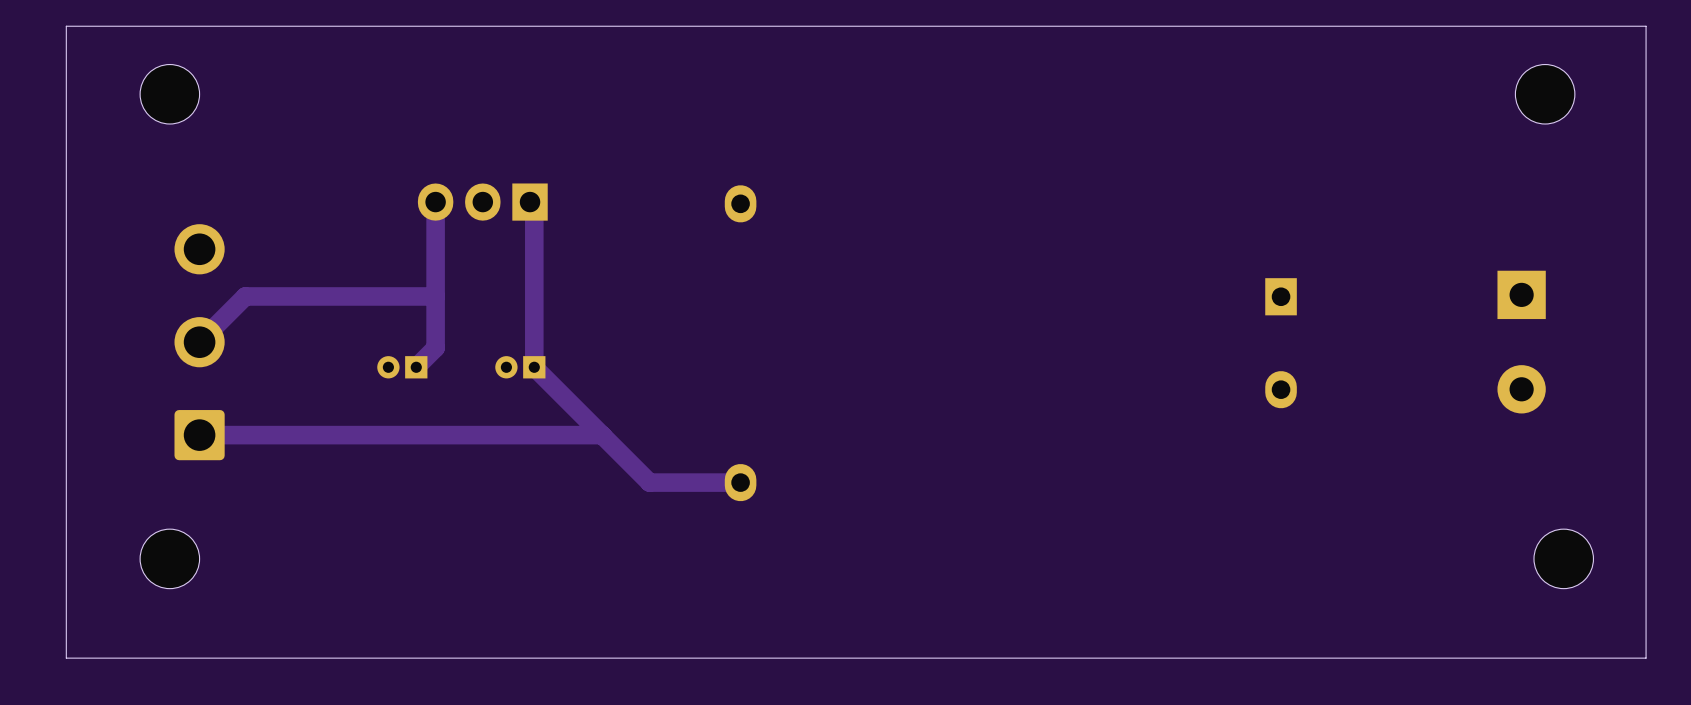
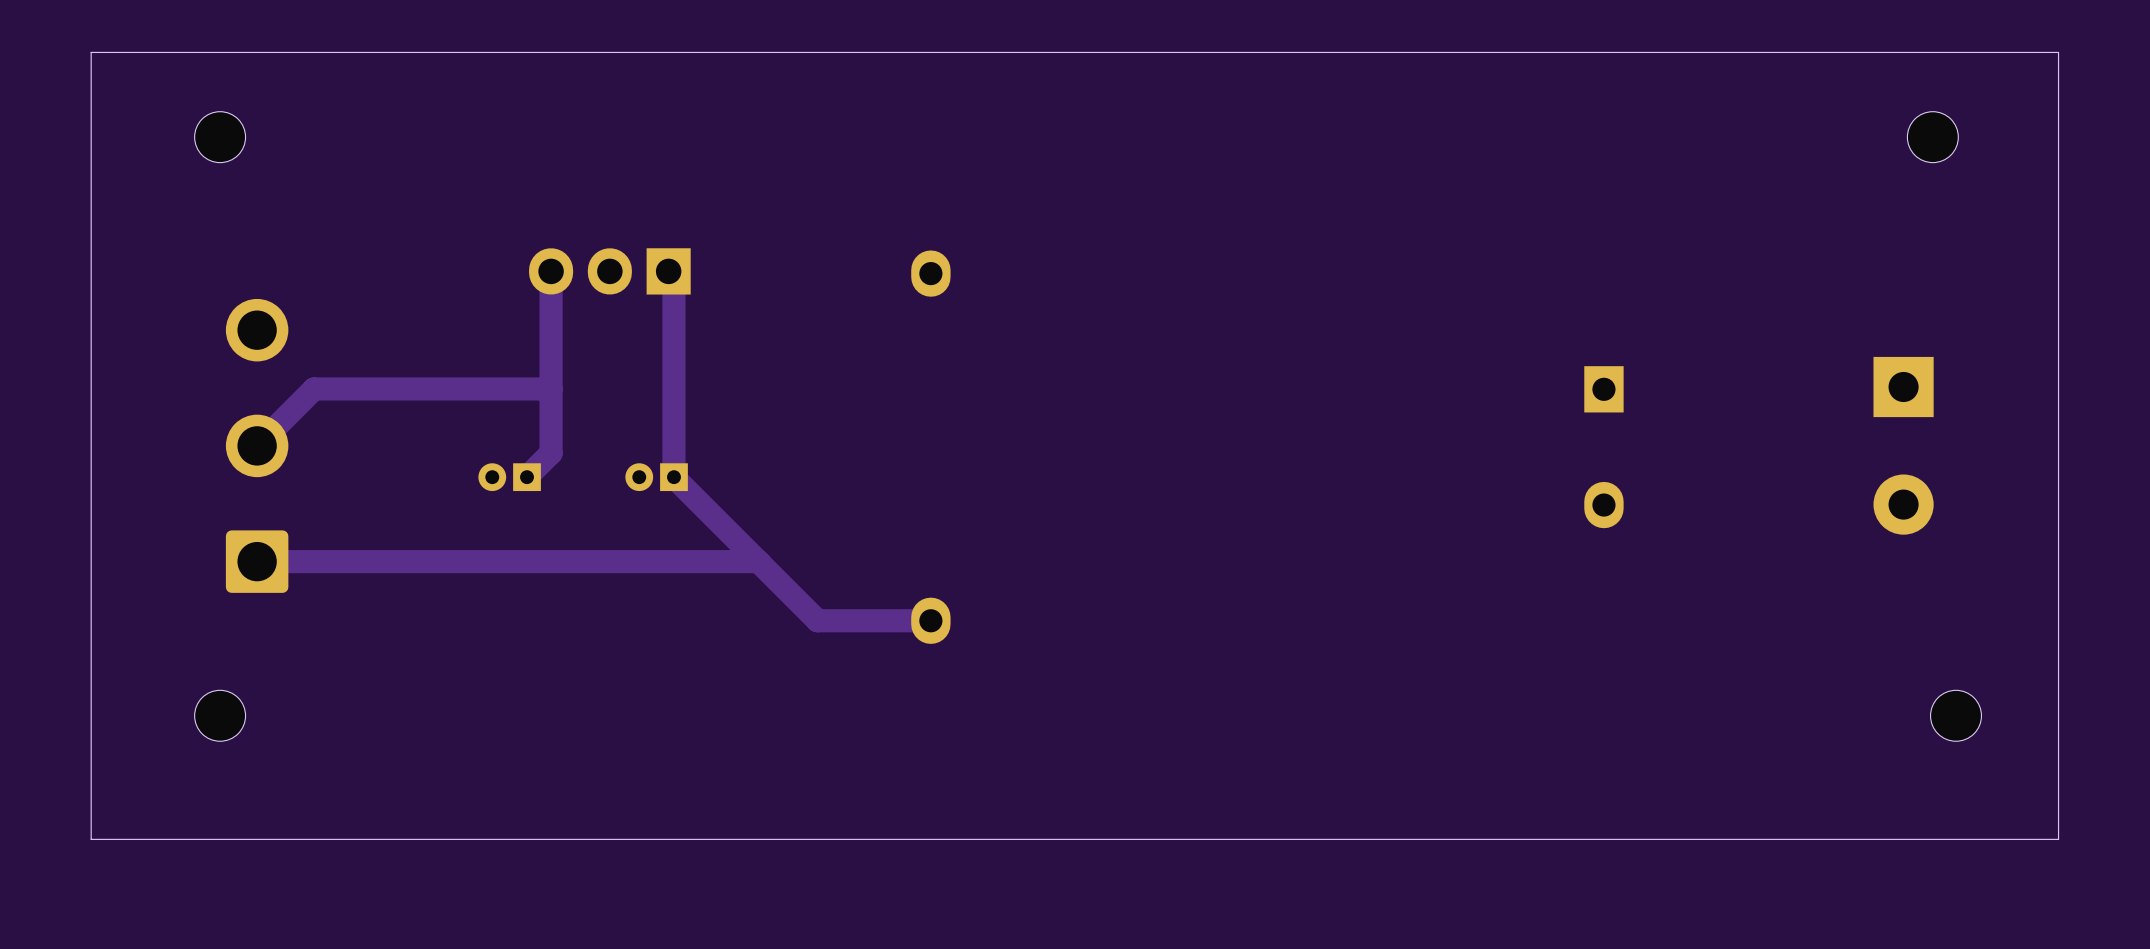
part footprint: [140, 64, 200, 125] -> [194, 111, 246, 163]
part footprint: [1515, 64, 1575, 125] -> [1907, 111, 1959, 163]
part footprint: [140, 529, 200, 589] -> [194, 690, 246, 742]
part footprint: [1533, 529, 1594, 589] -> [1930, 690, 1982, 742]

